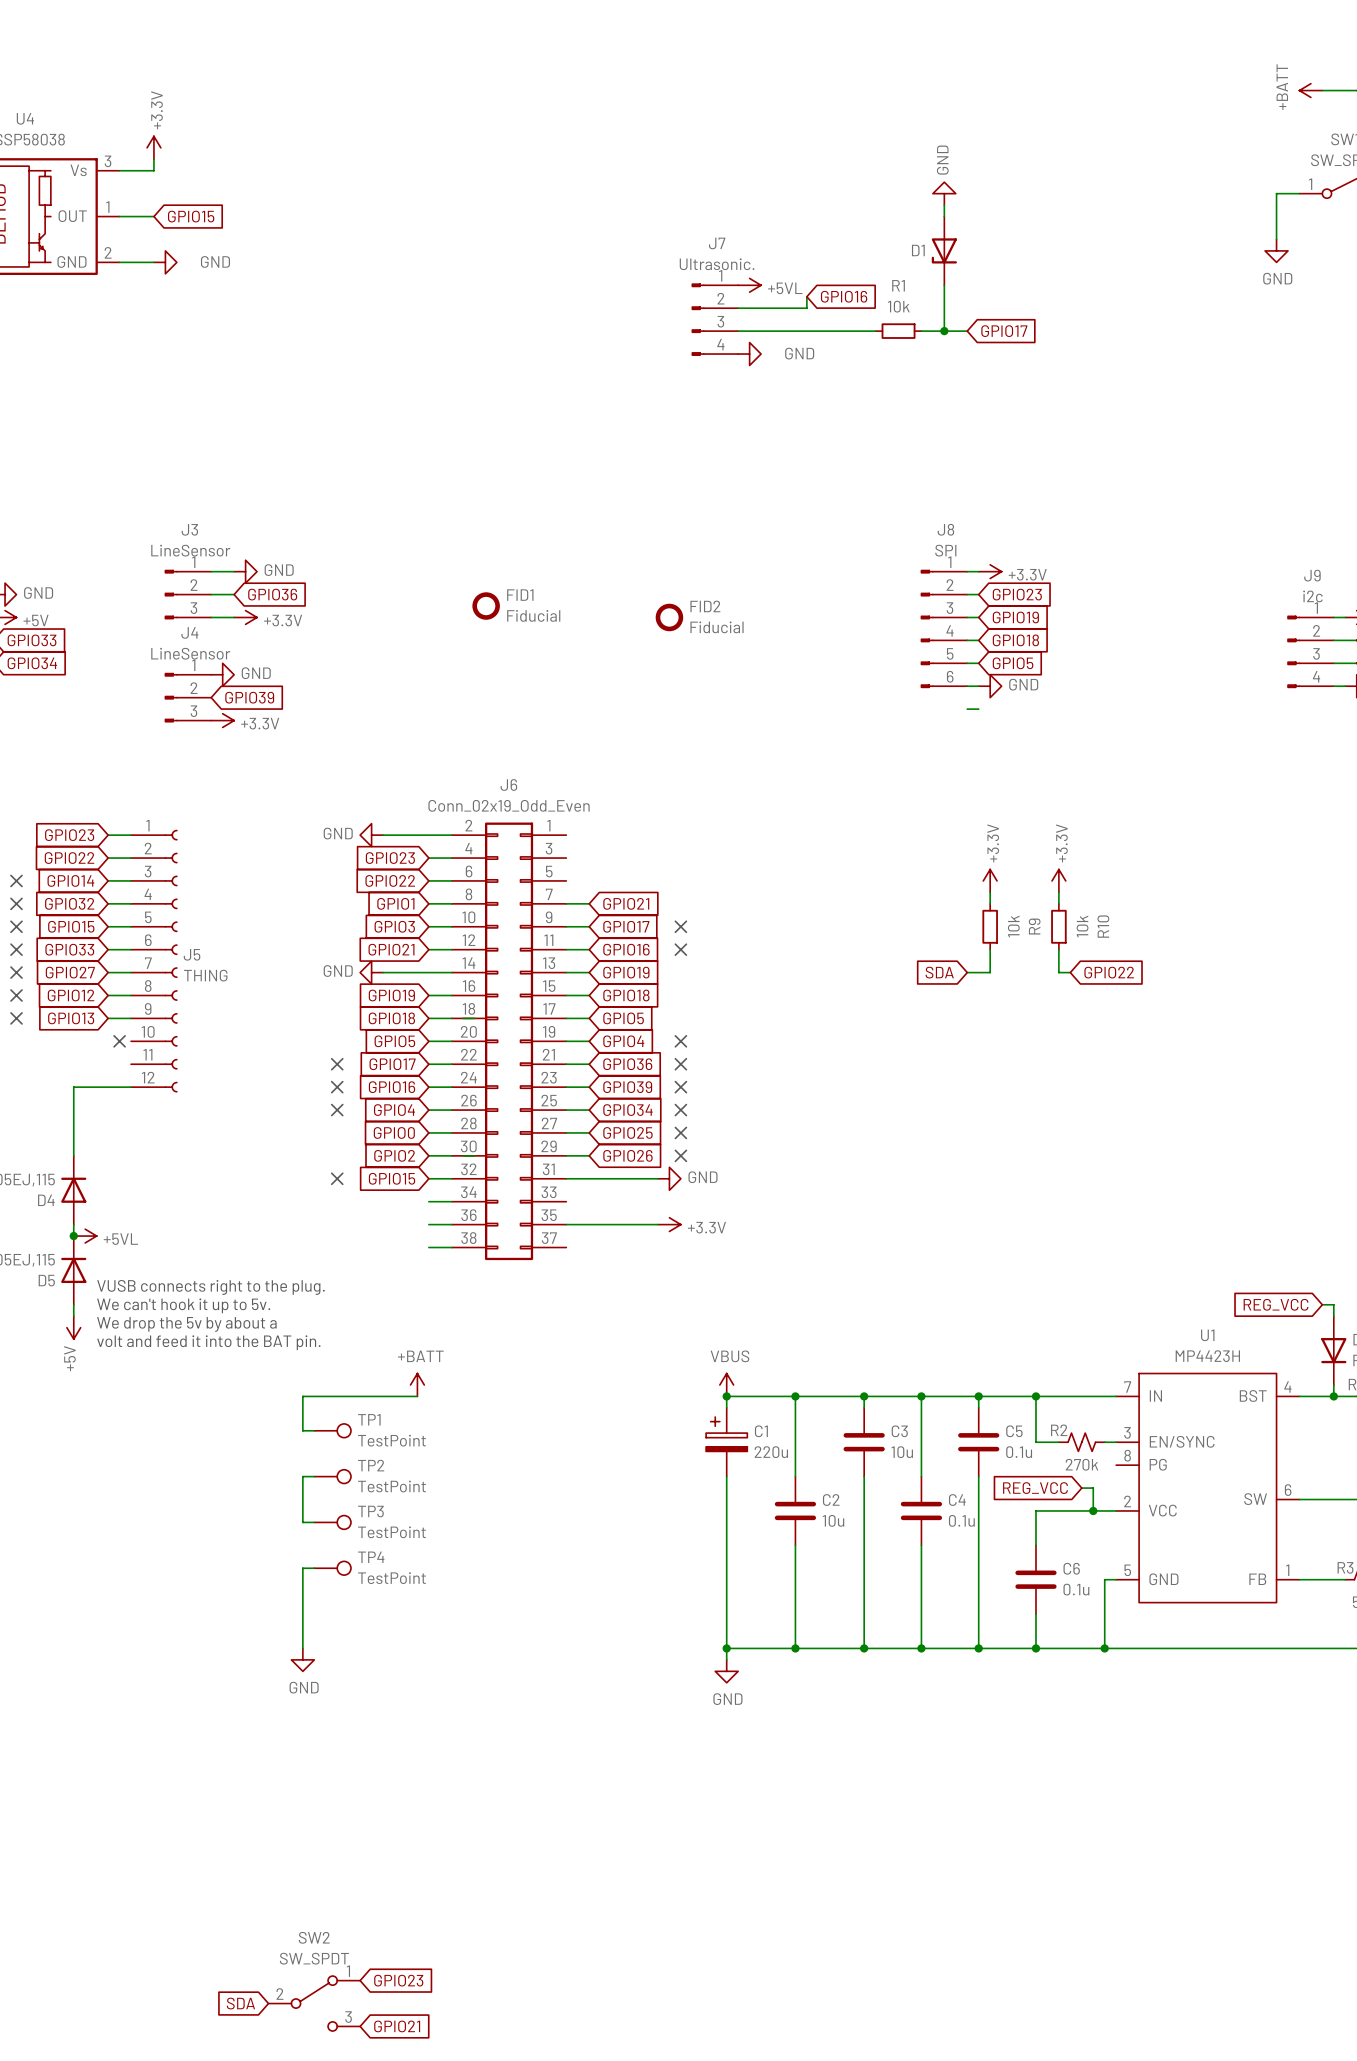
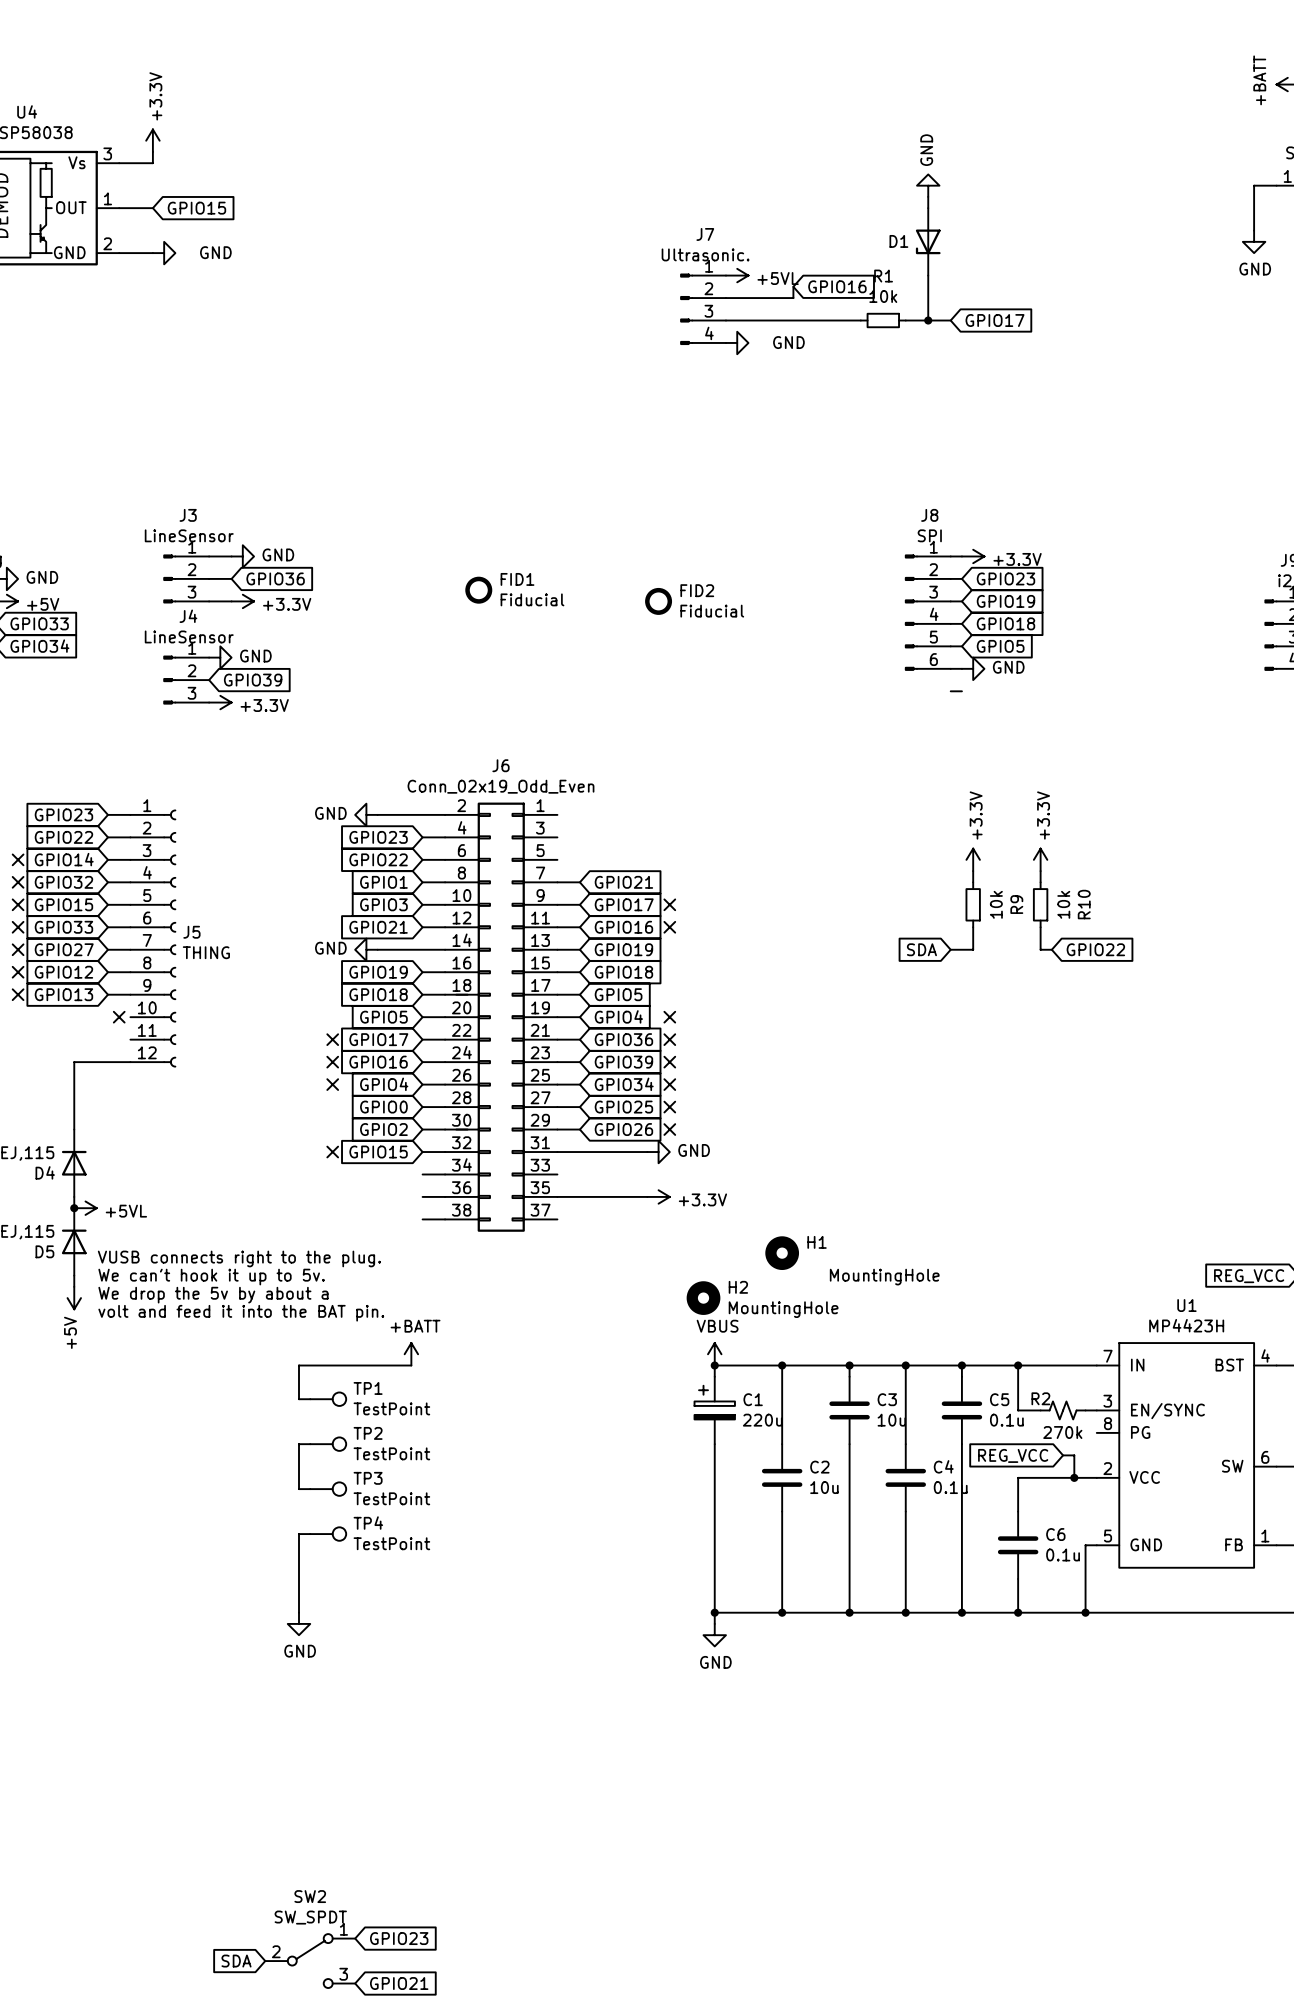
H1: none -> MountingHole (782, 1253)
H2: none -> MountingHole (703, 1298)

